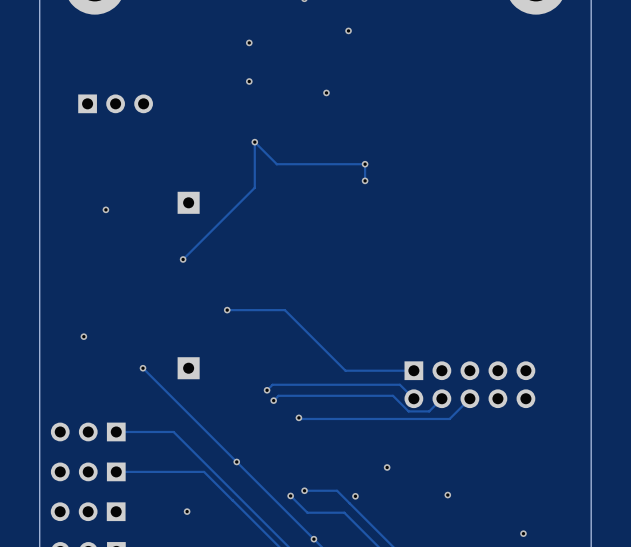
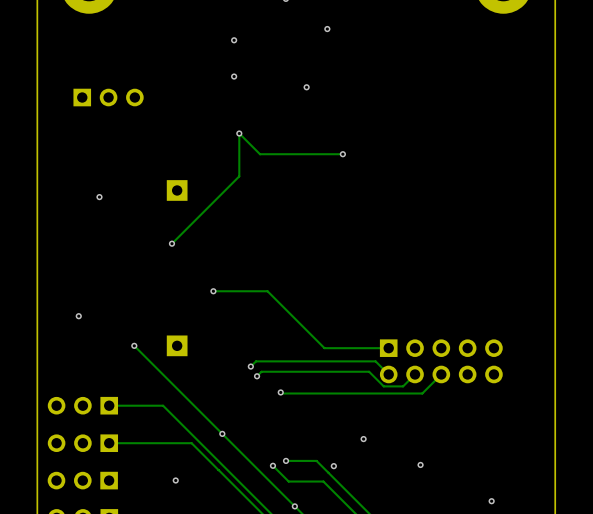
track: (365, 164) (365, 180) -> none
via: (365, 180) -> none

